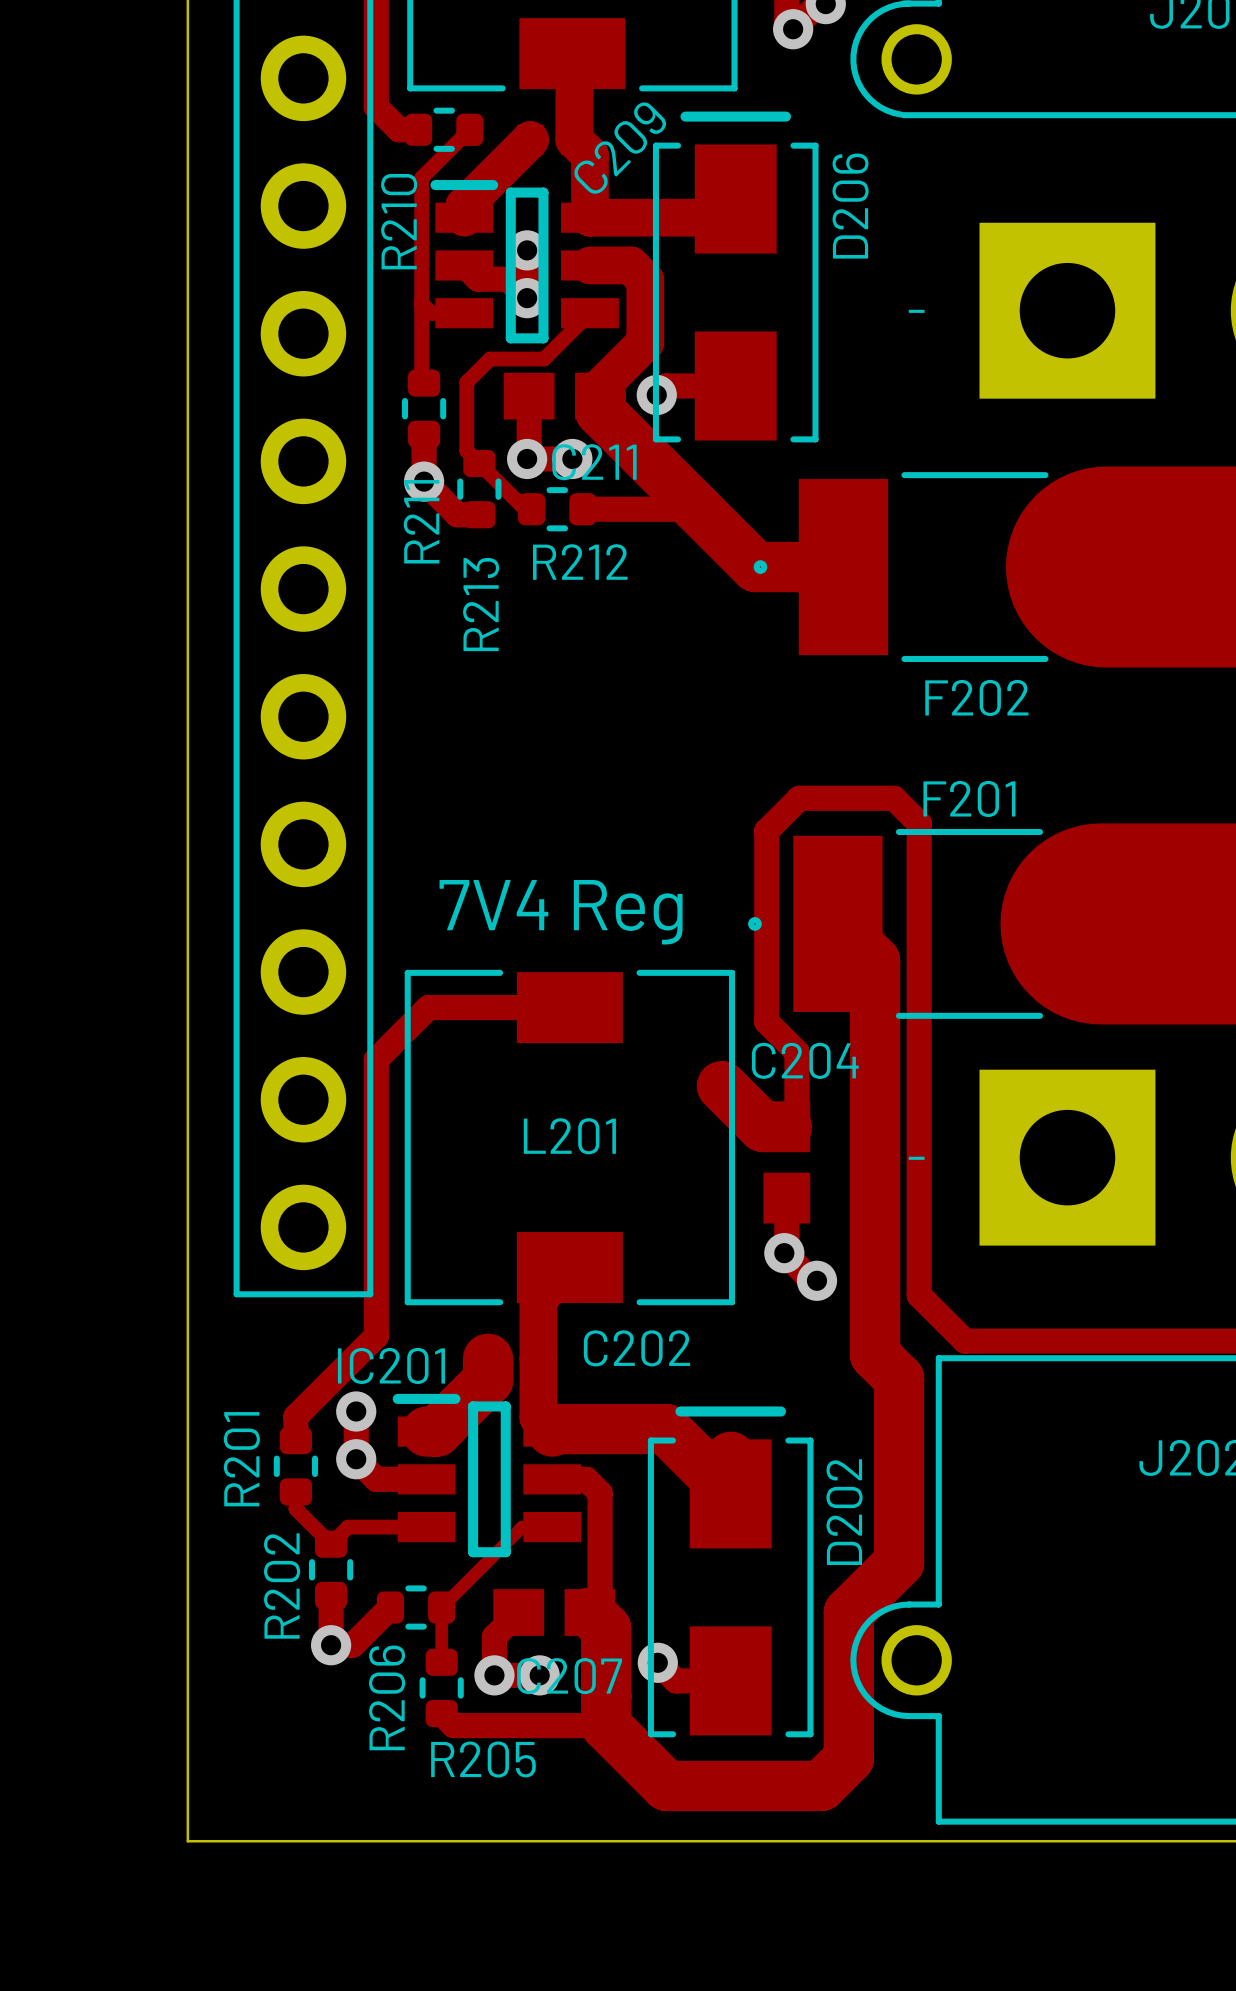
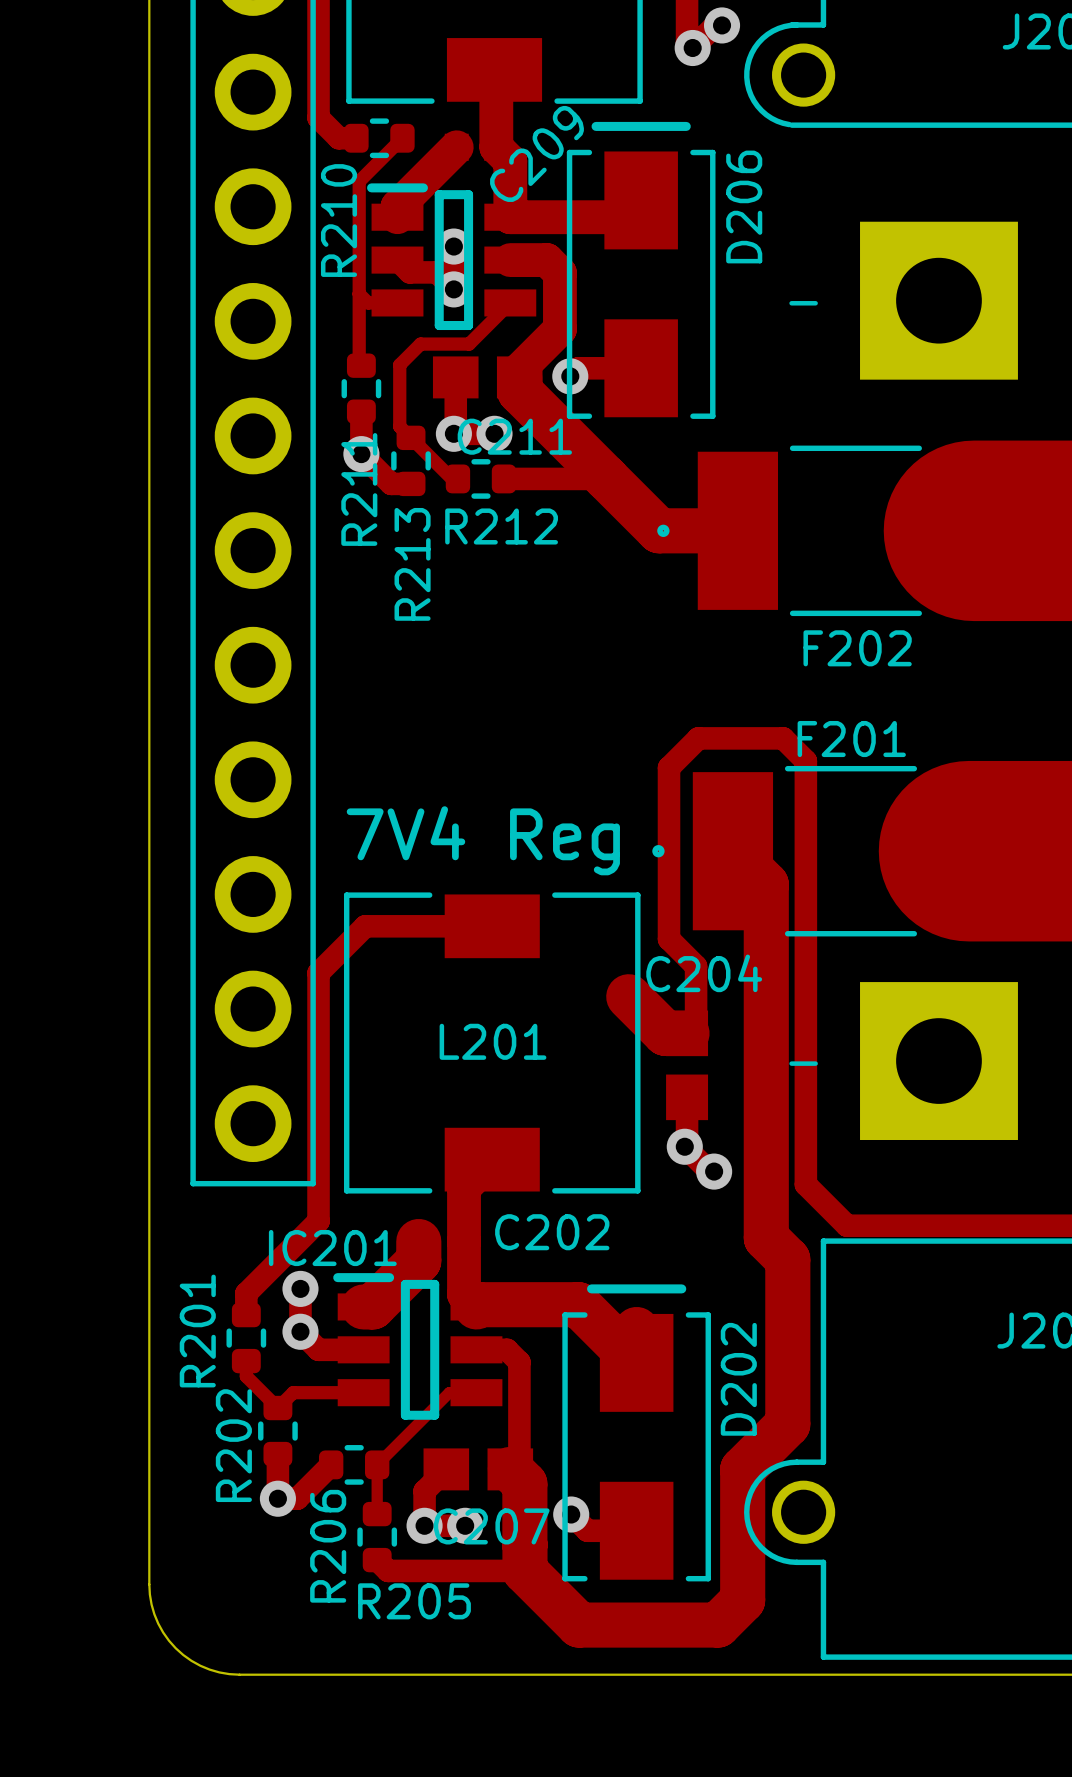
board edge: (187, 1740) (187, 1841) (288, 1841) -> (149, 1584) (151, 1604) (158, 1623) (175, 1648) (191, 1660) (209, 1669) (239, 1674)

